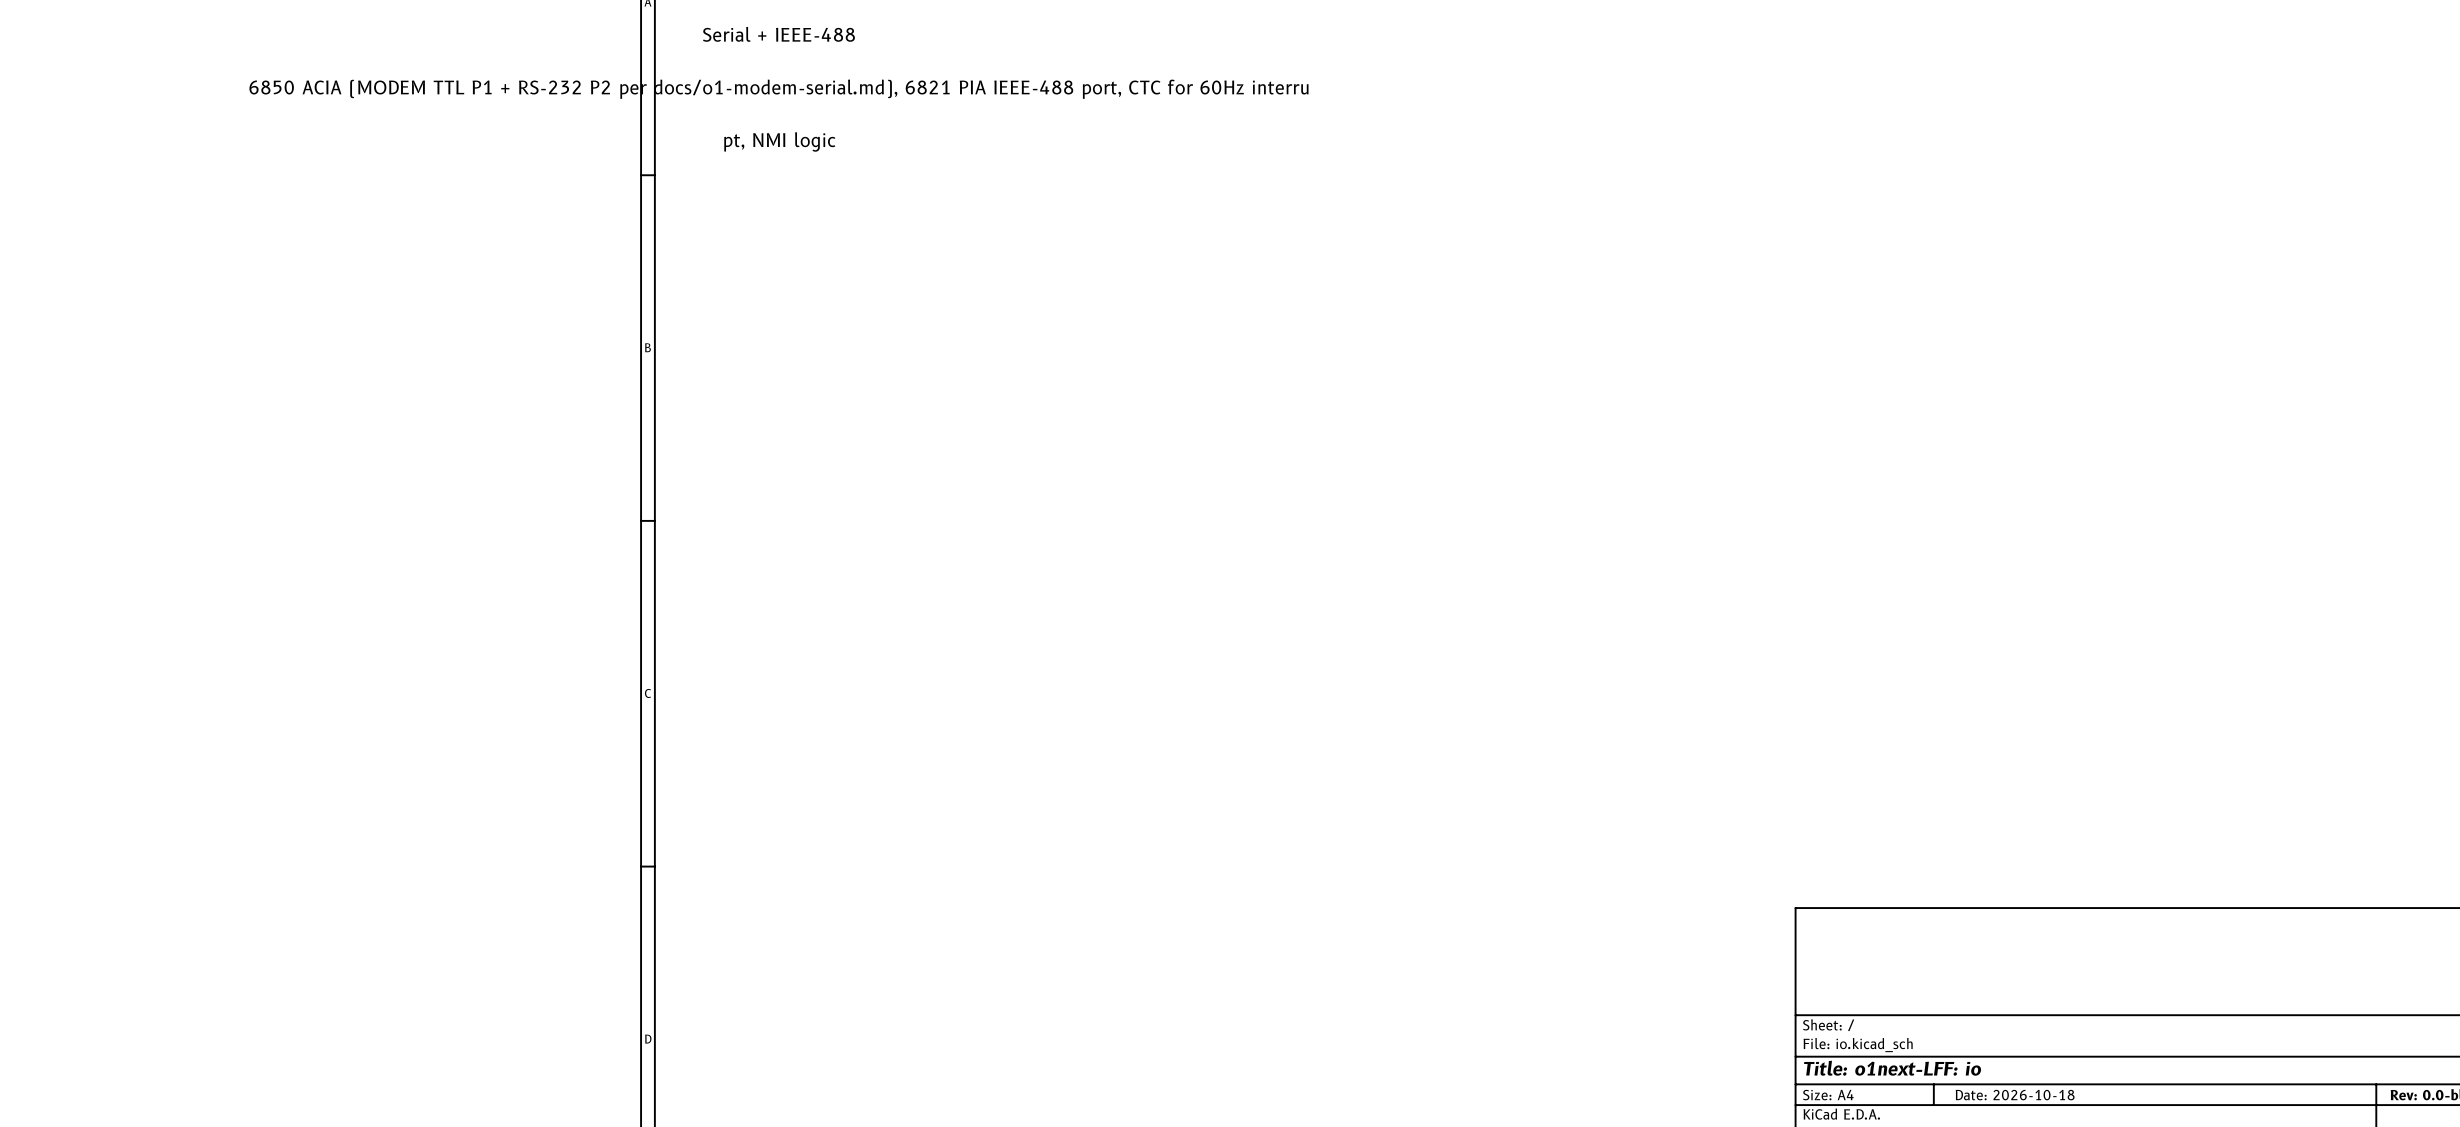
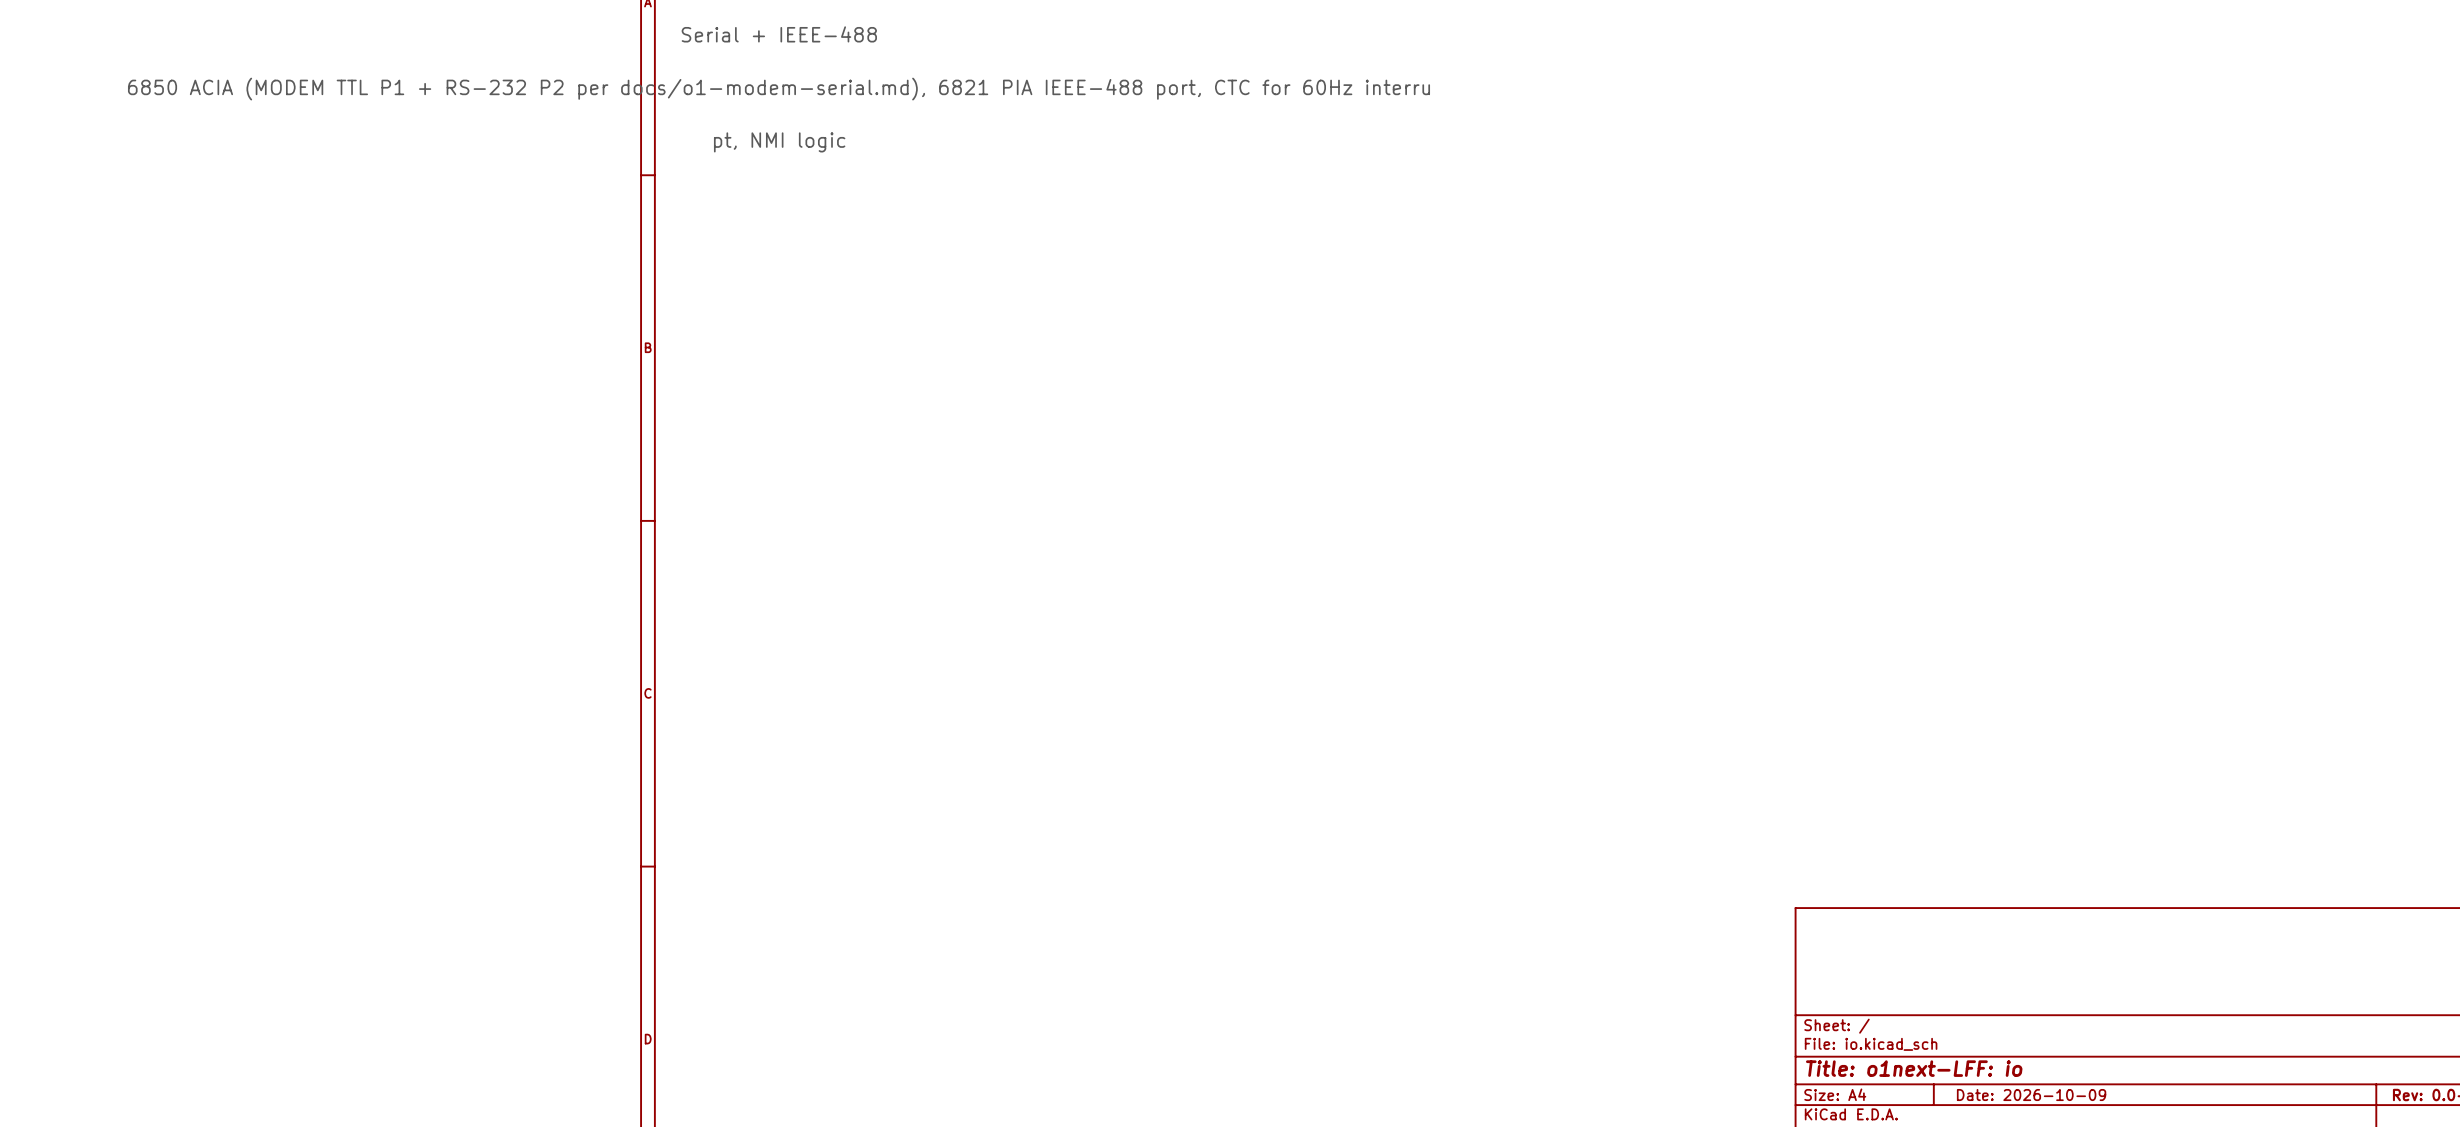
title block: Date: 2026-10-18 (2015, 1095) -> Date: 2026-10-09 (2031, 1095)

